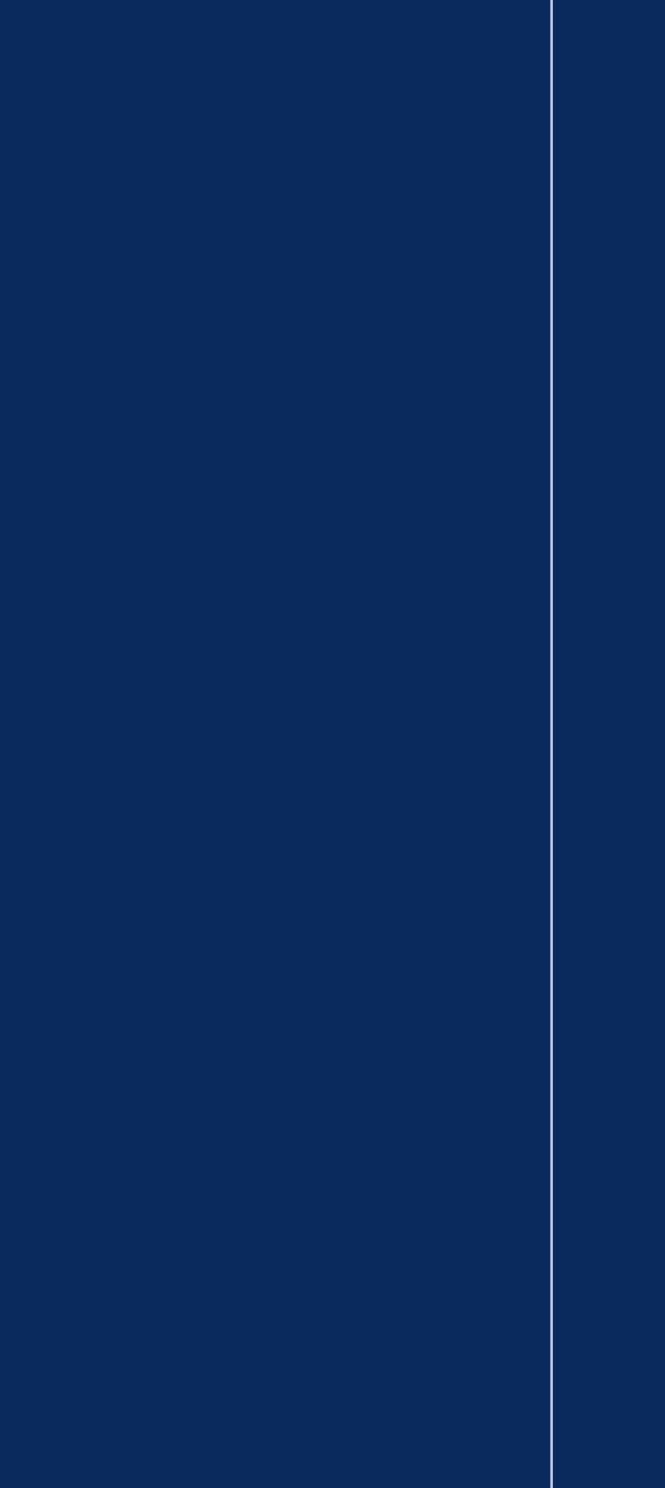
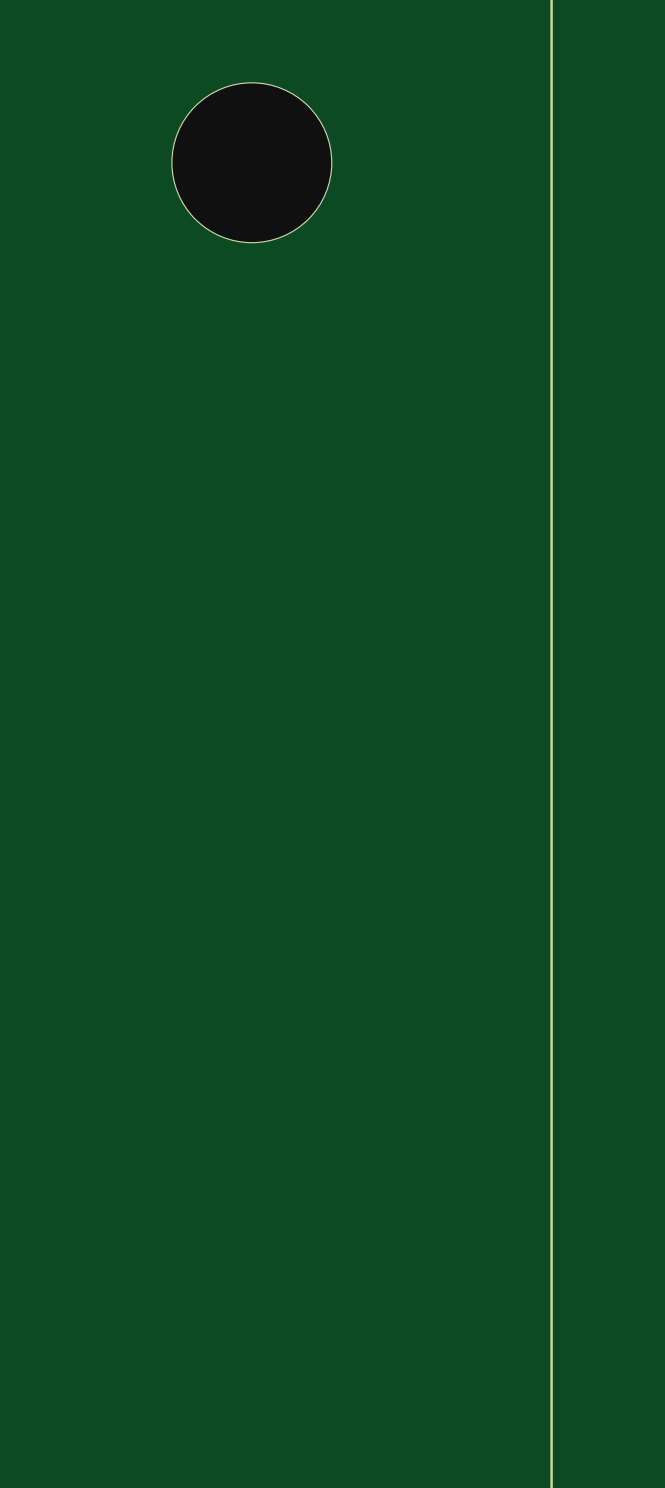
part: none -> (251, 162)

